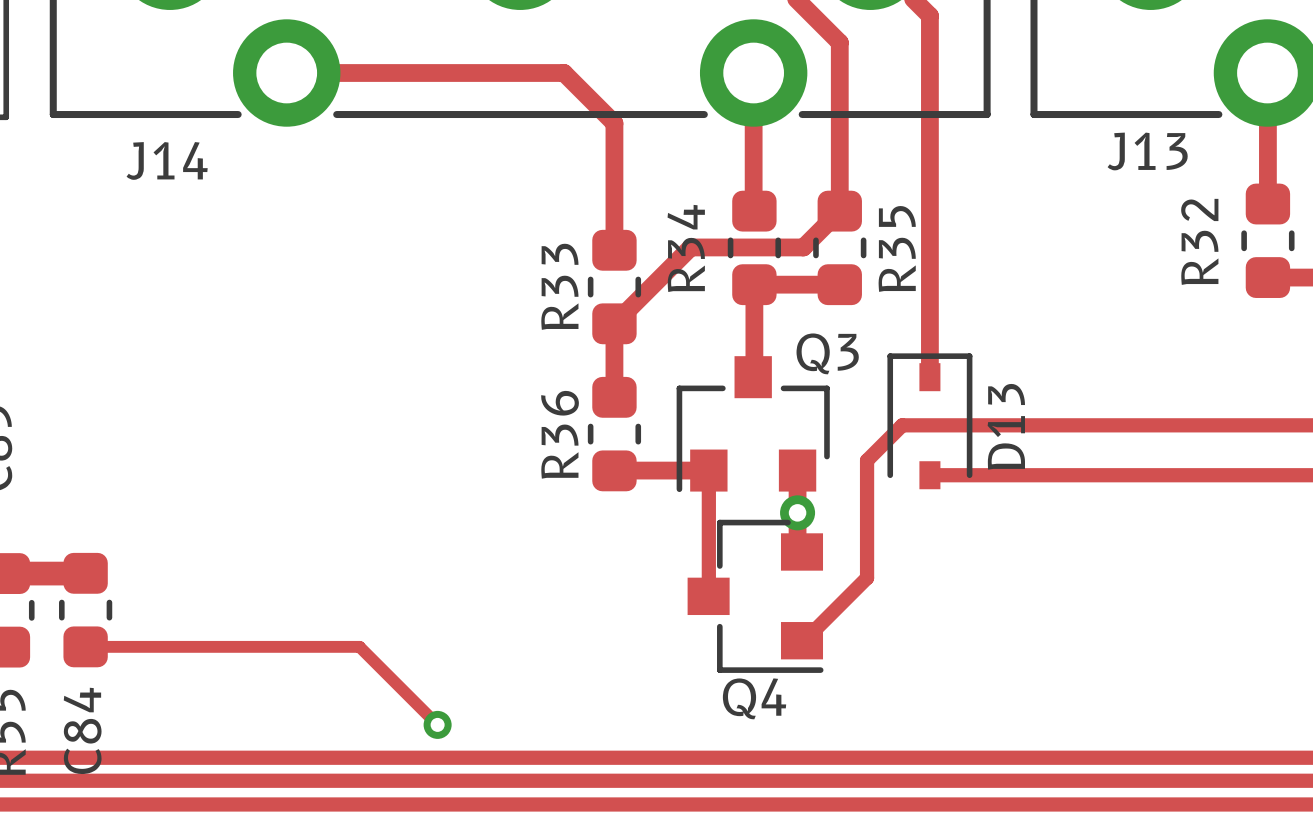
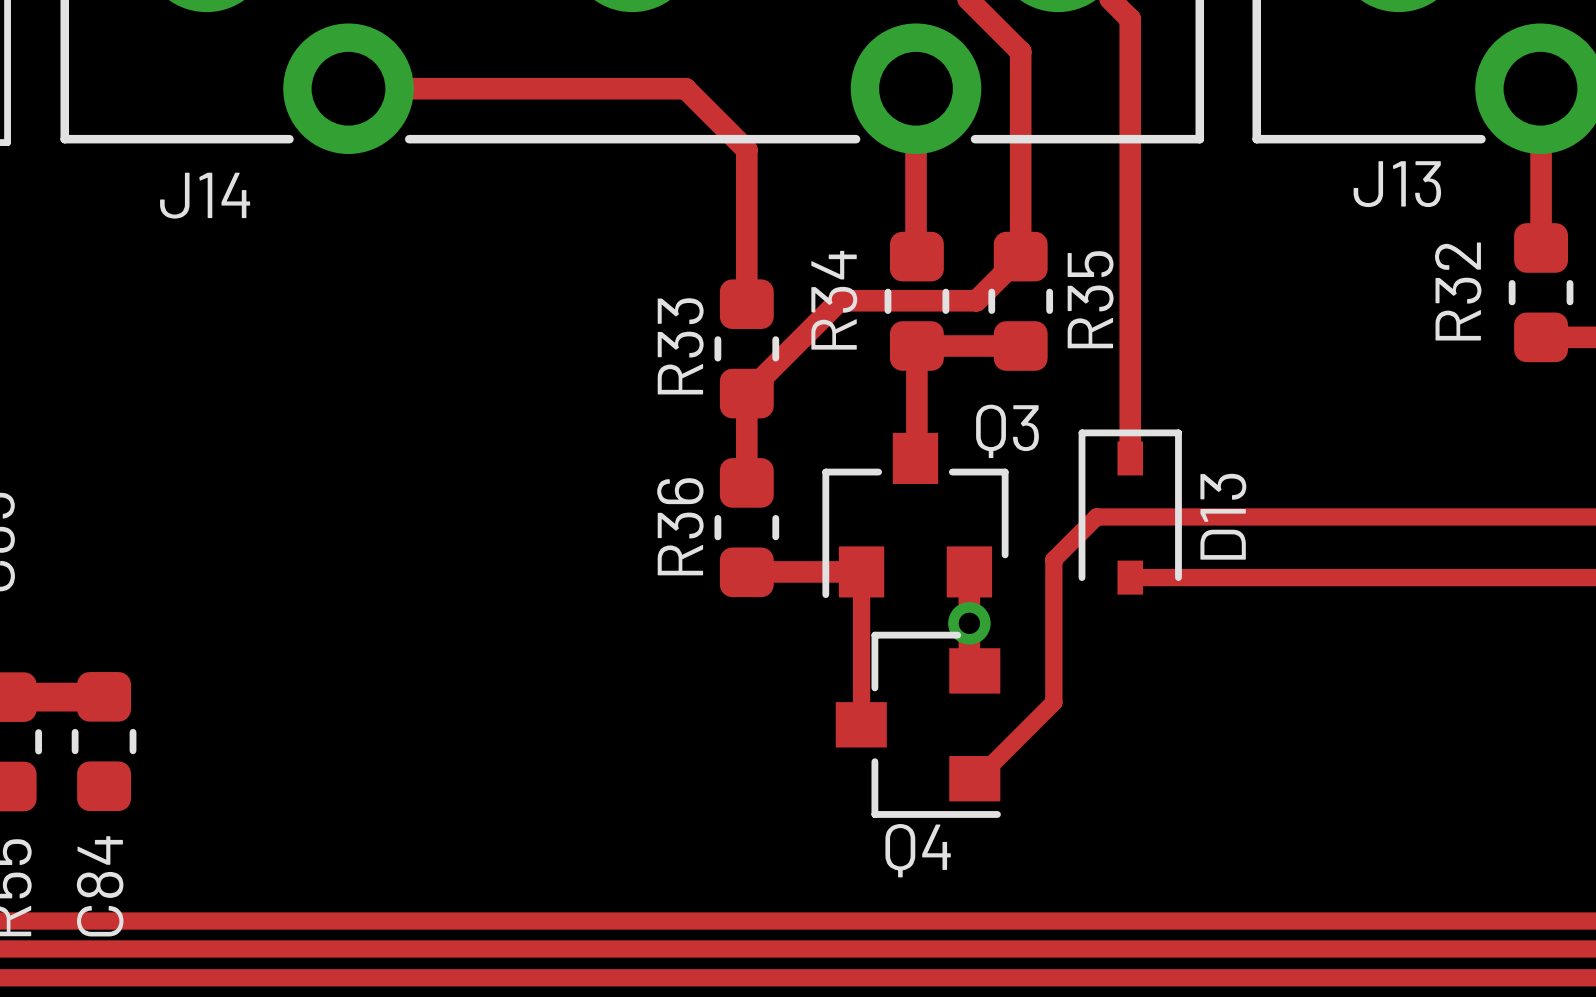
track: (85, 646) (359, 646) (437, 724) -> none
via: (437, 724) -> none

